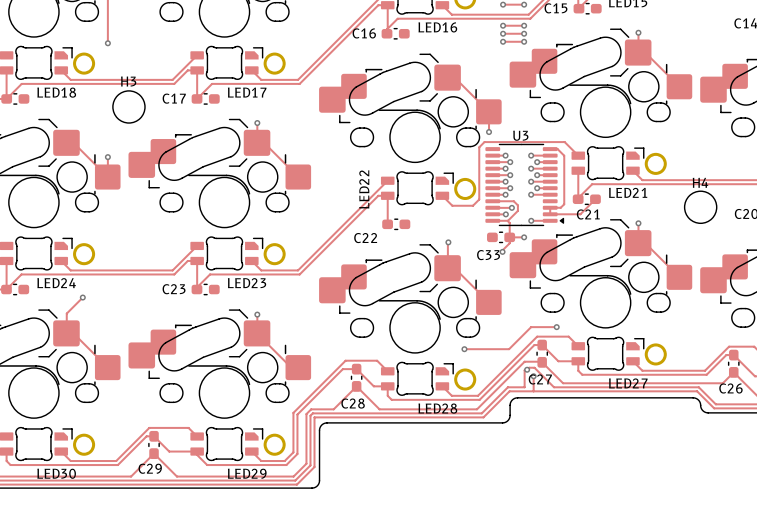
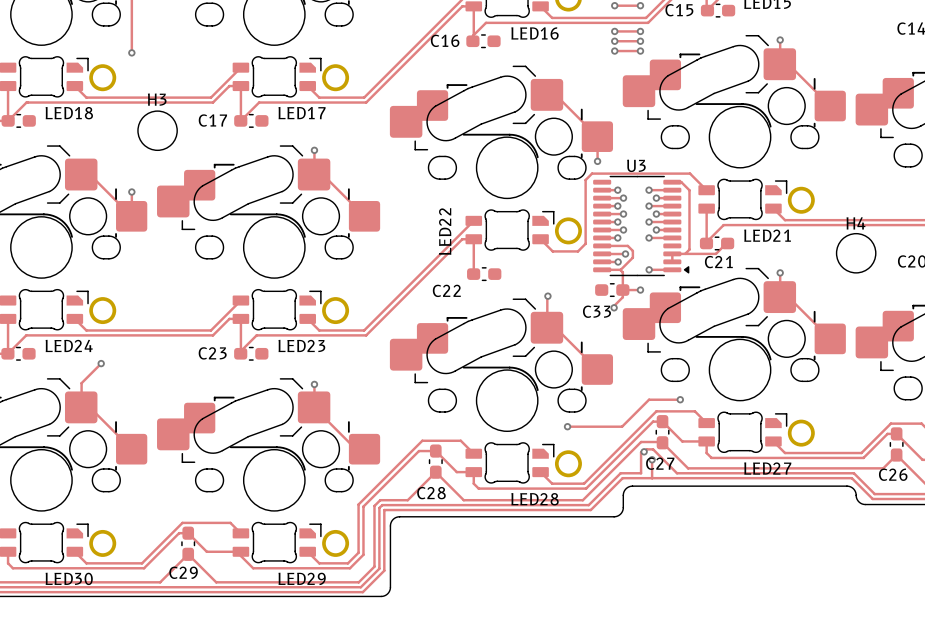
track: none -> (727, 242) (715, 253) (685, 253)
track: (595, 199) (580, 214) (550, 214) -> none

